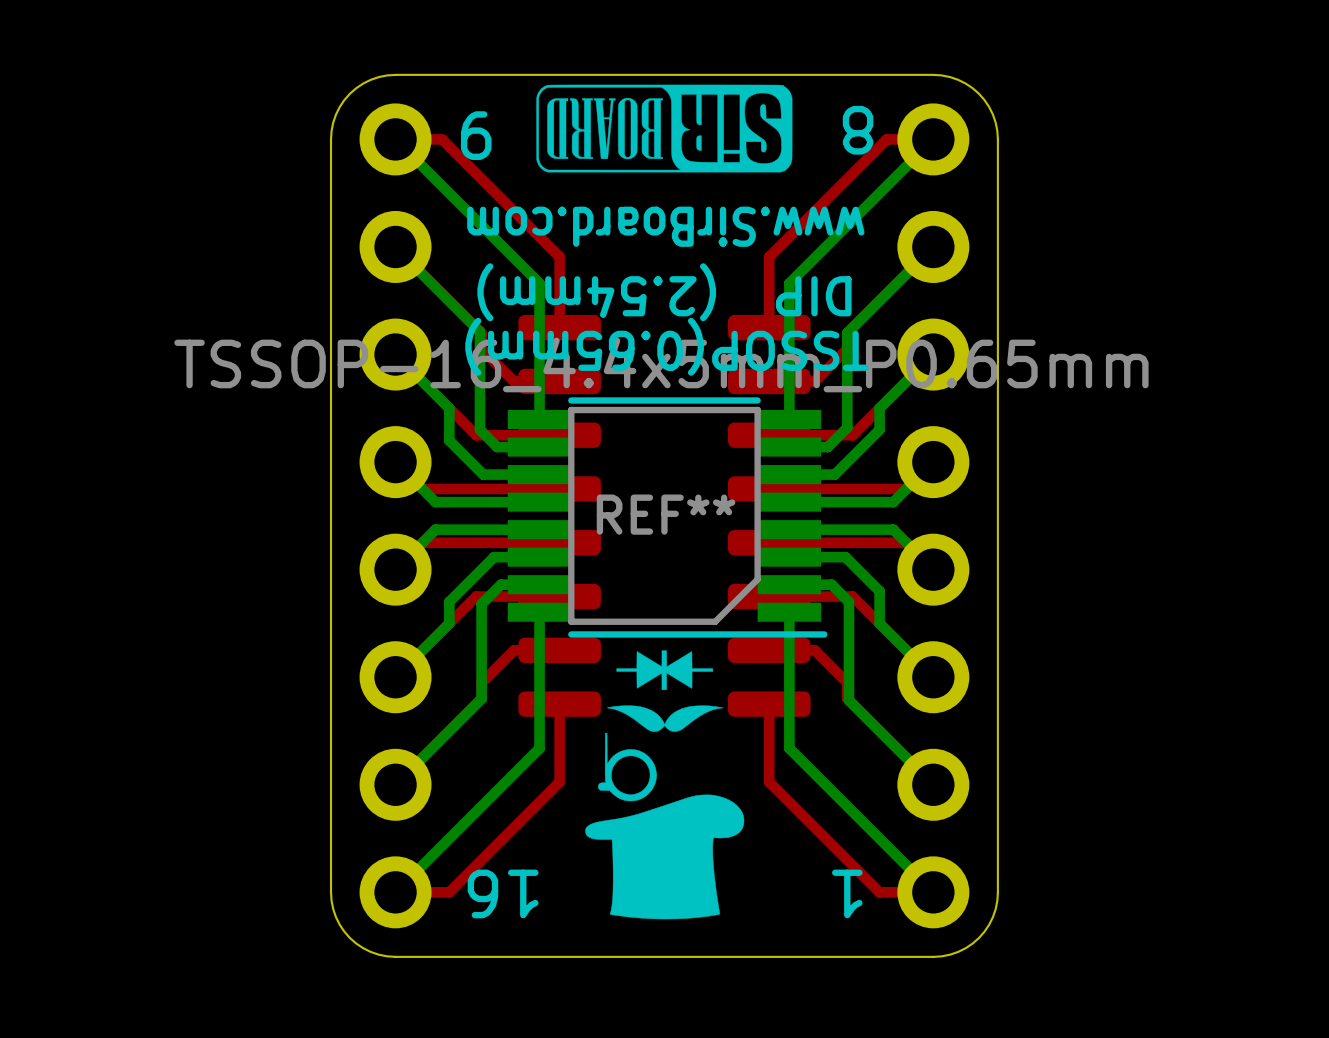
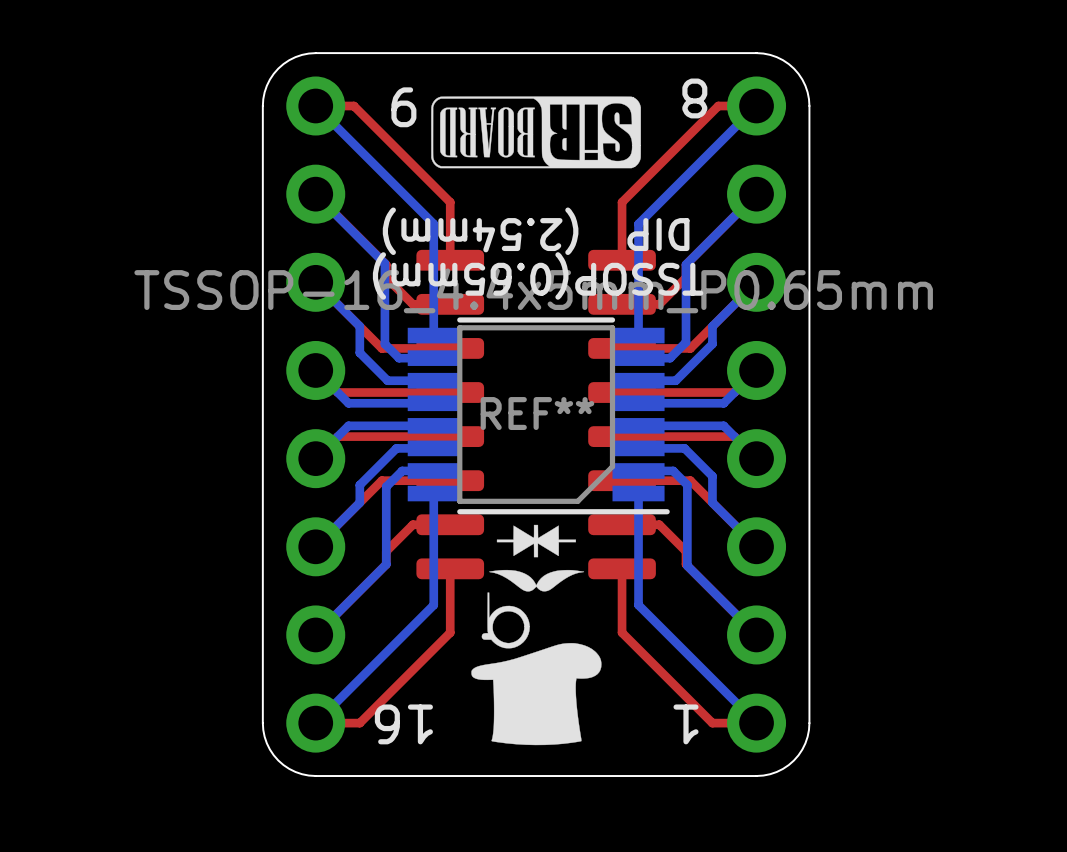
drawing position: (664, 128) -> (536, 132)
text position: 9 (476, 135) -> 9 (403, 107)
text: www.SirBoard.com (665, 226) -> none

